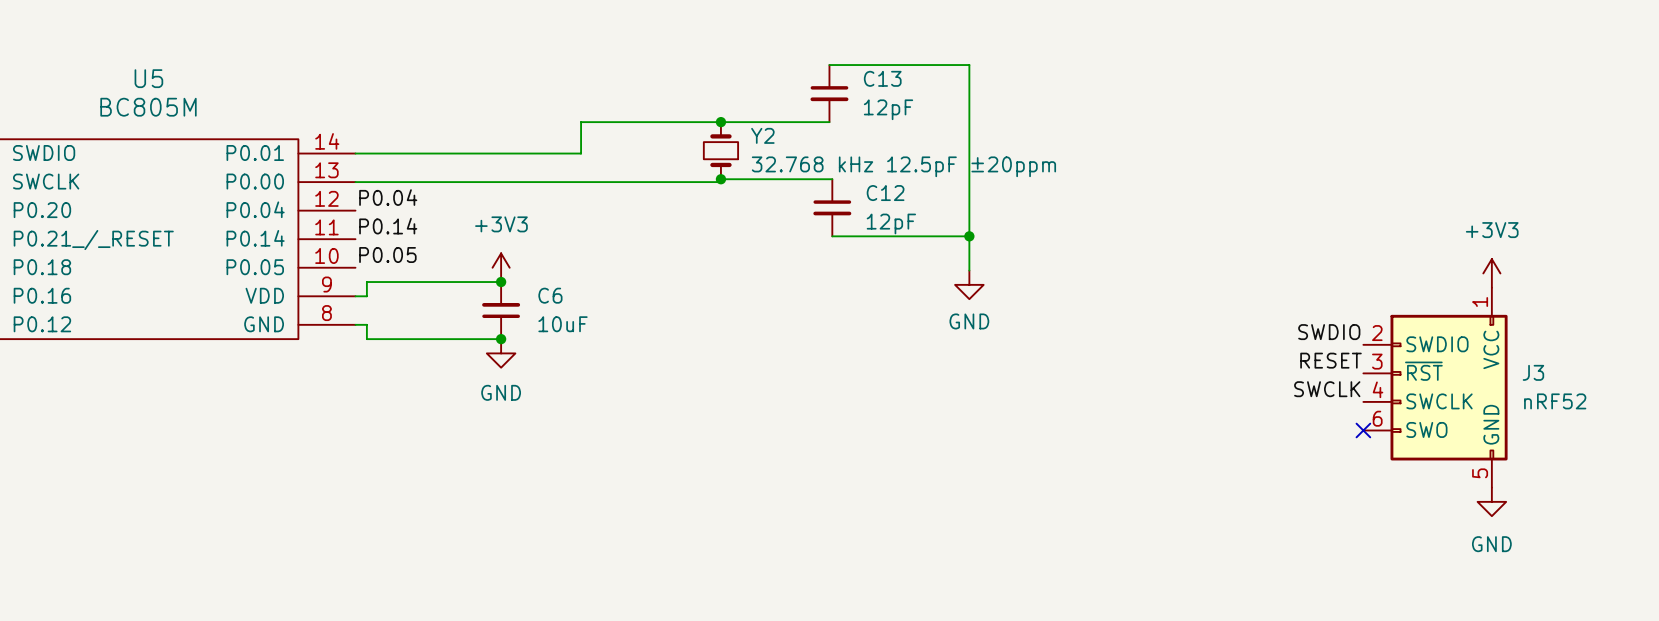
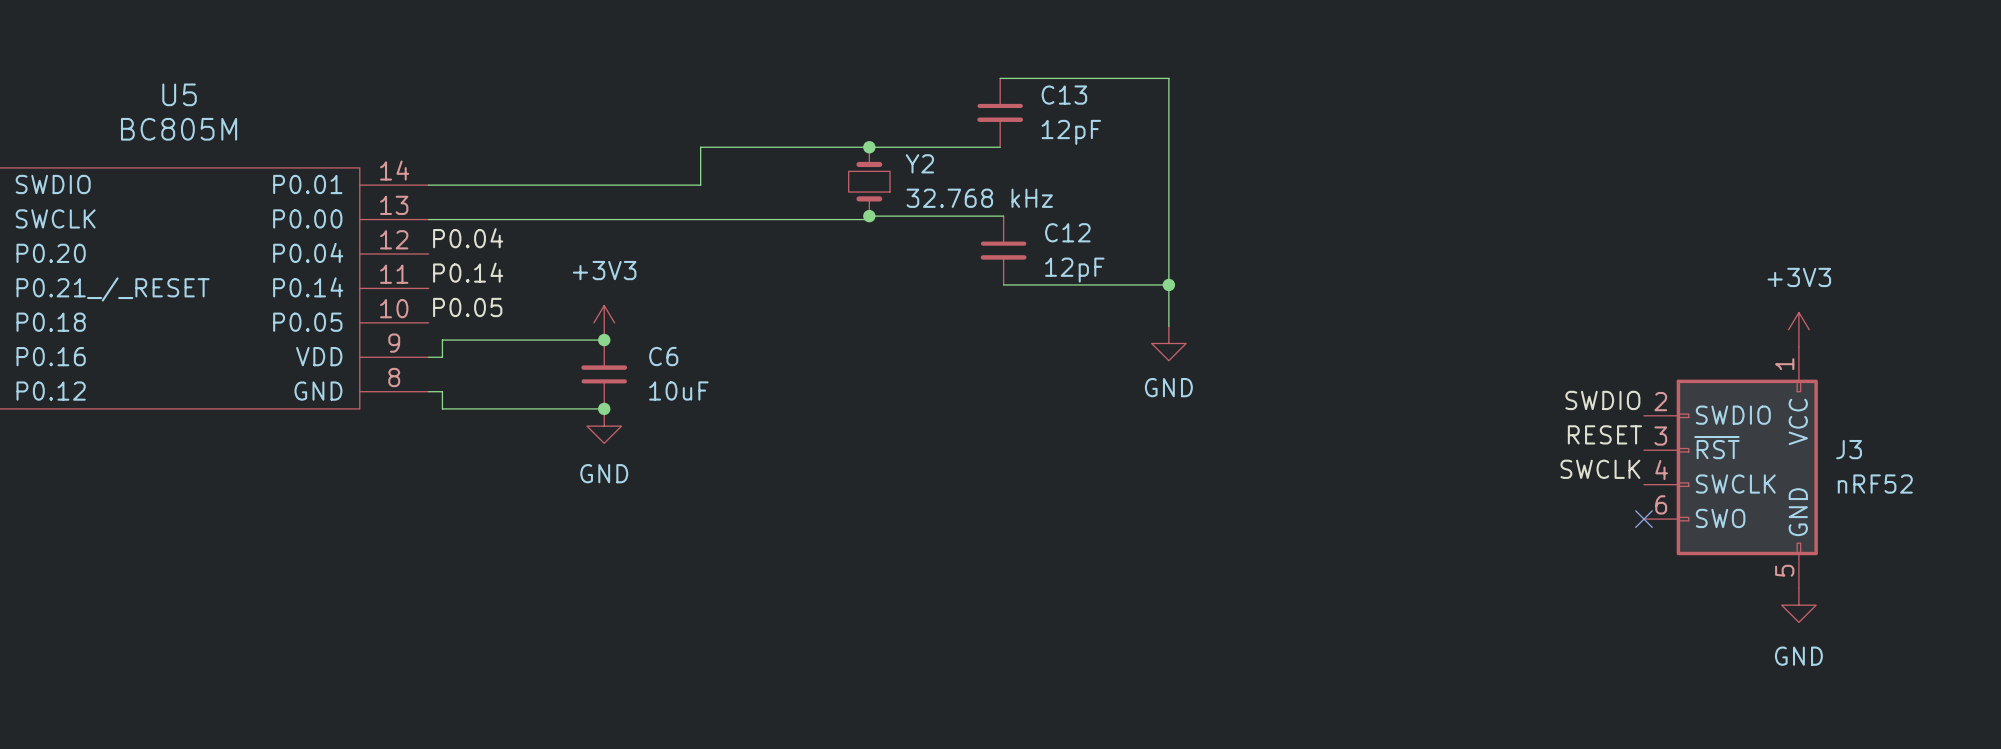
Y2 value: 32.768 kHz 12.5pF ±20ppm (903, 166) -> 32.768 kHz (979, 198)

